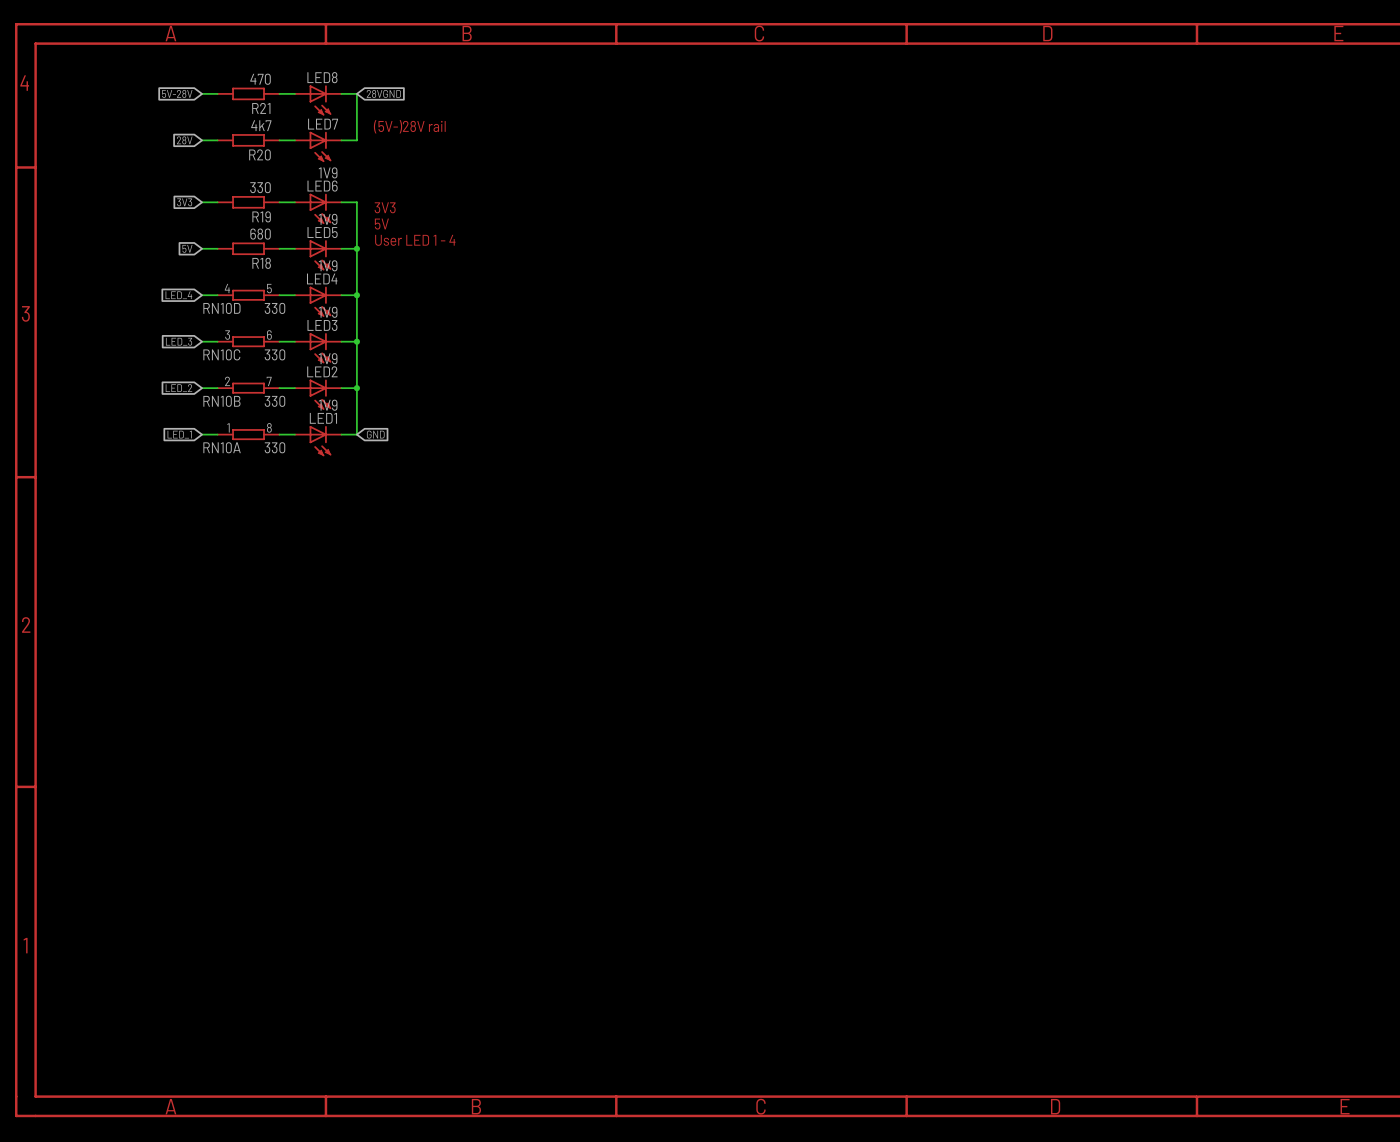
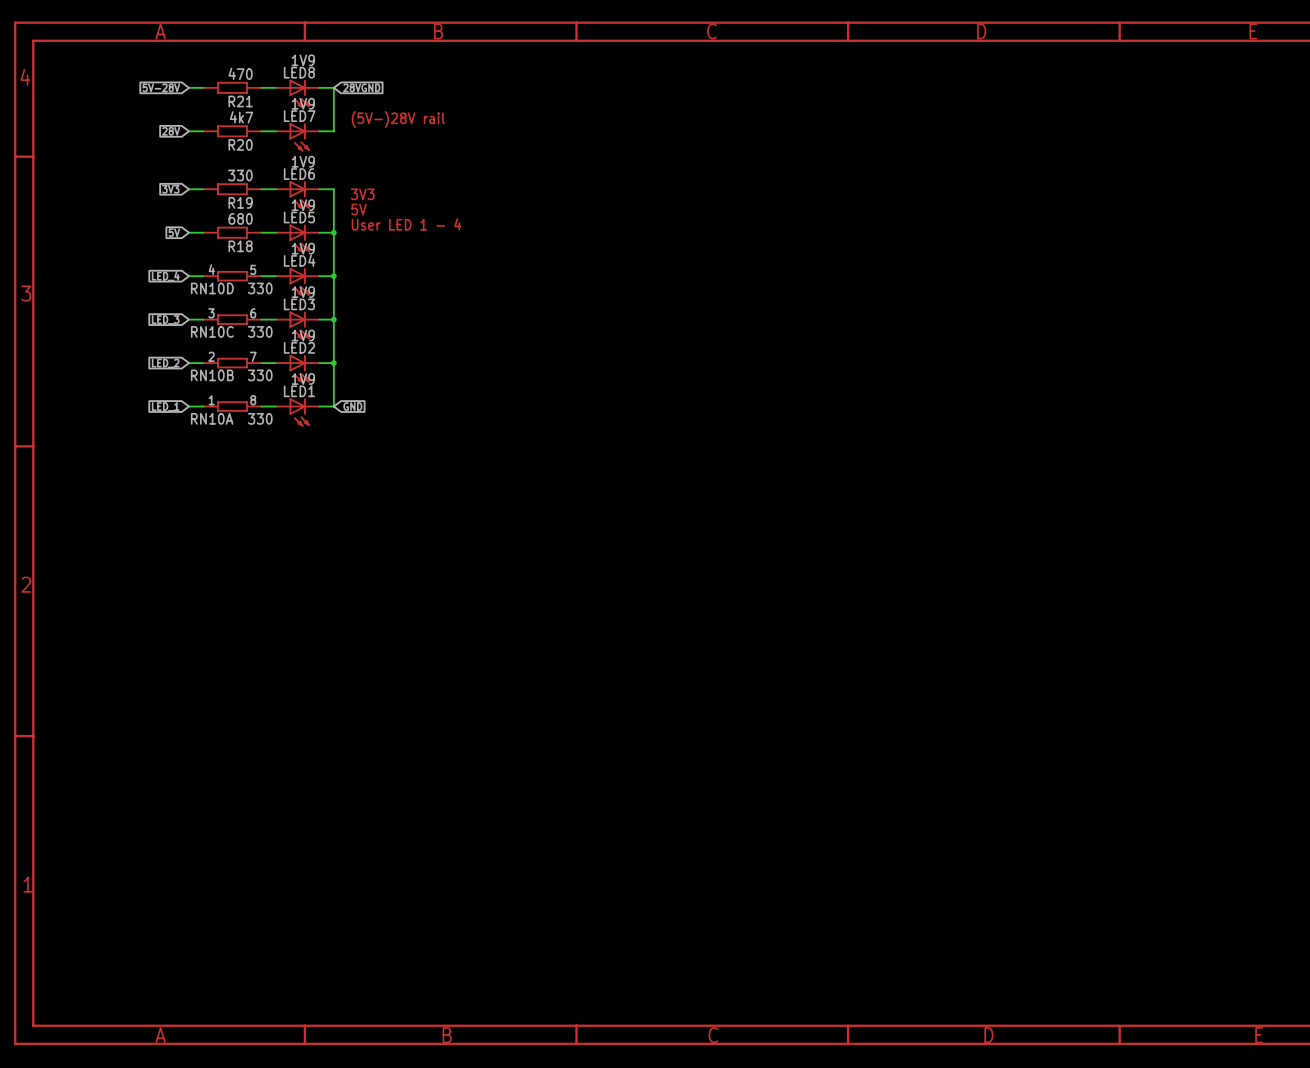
LED8 value: none -> 1V9 (303, 60)
LED7 value: none -> 1V9 (303, 103)

